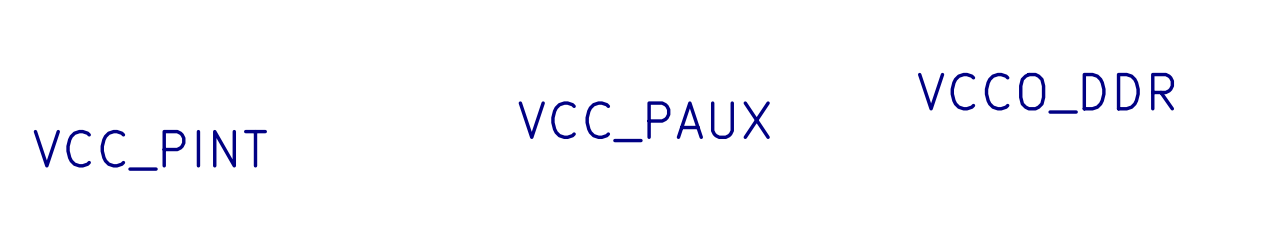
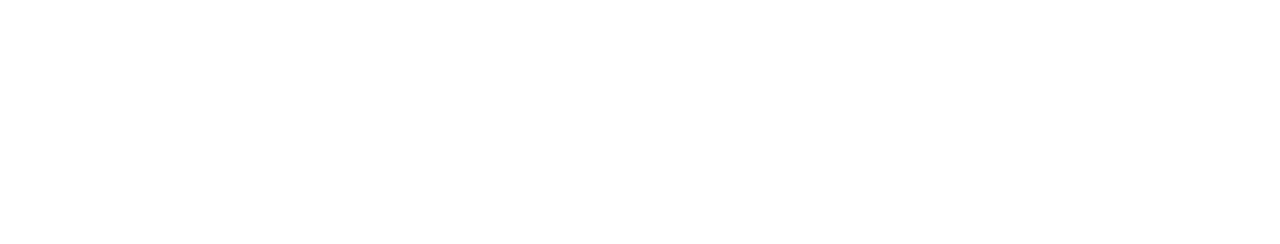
text: VCCO_DDR (1046, 93) -> none
text: VCC_PAUX (644, 121) -> none
text: VCC_PINT (150, 150) -> none

